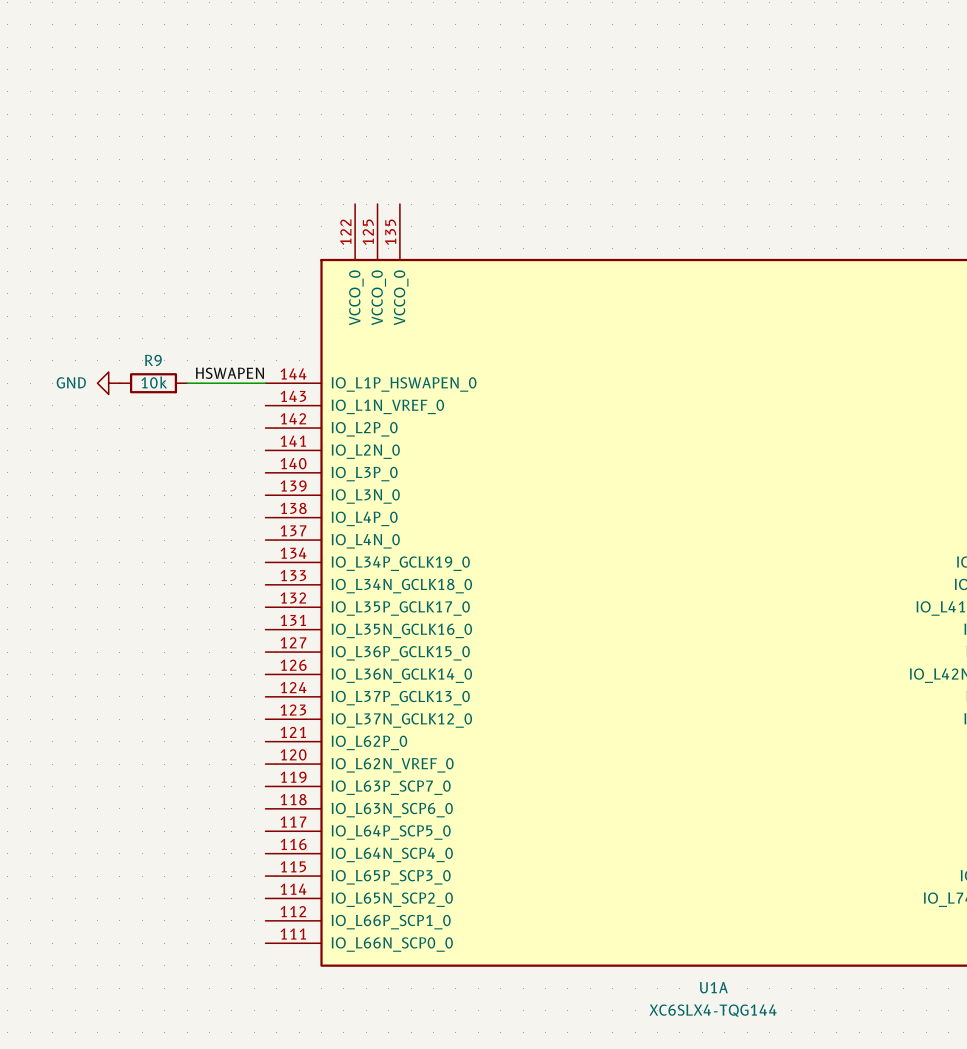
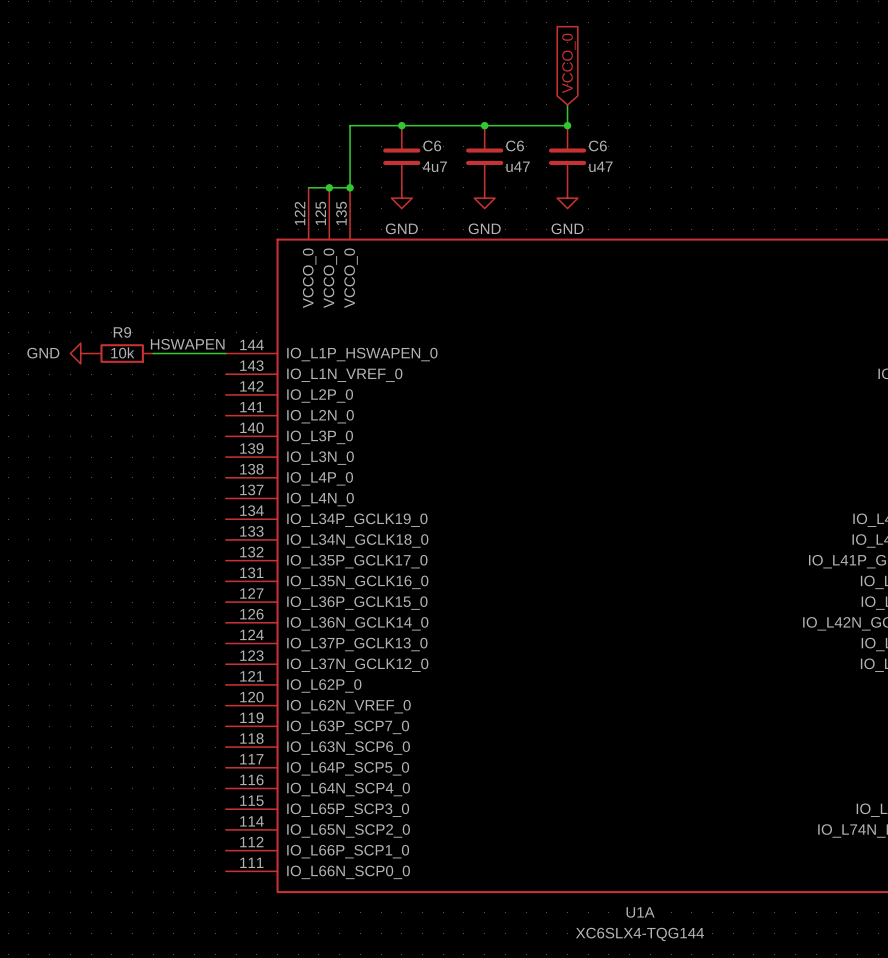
global label: none -> VCCO_0 (568, 63)
wire: none -> (567, 104) (567, 125) (350, 125) (350, 187) (308, 187)
junction: none -> (401, 125)
junction: none -> (484, 125)
junction: none -> (567, 125)
C6: none -> 4u7 (401, 156)
C6: none -> u47 (484, 156)
C6: none -> u47 (567, 156)
junction: none -> (329, 187)
junction: none -> (350, 187)
power symbol: none -> GND (401, 198)
power symbol: none -> GND (484, 198)
power symbol: none -> GND (567, 198)

